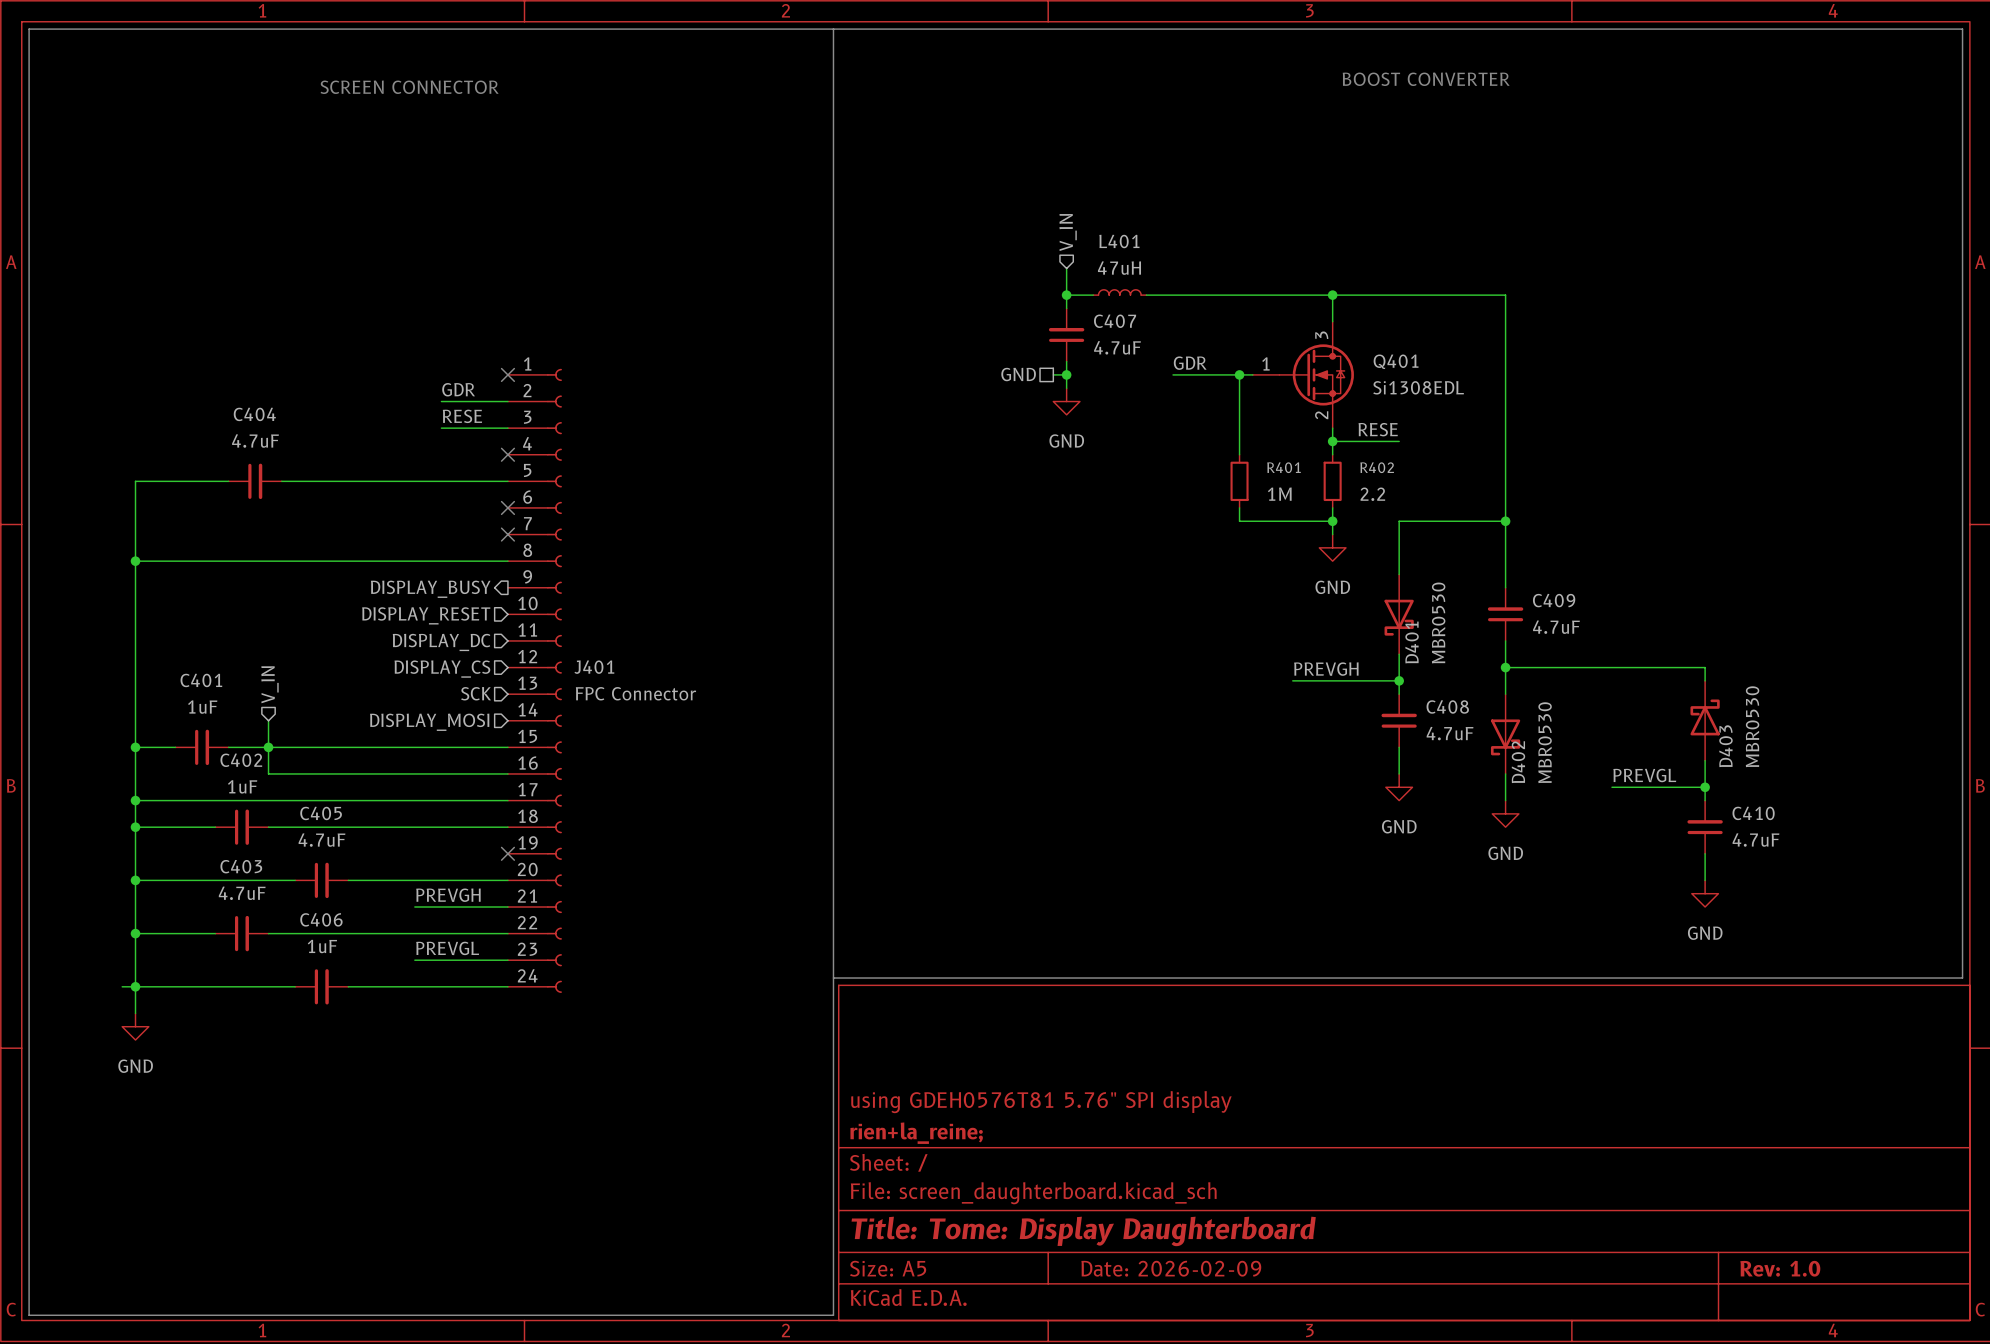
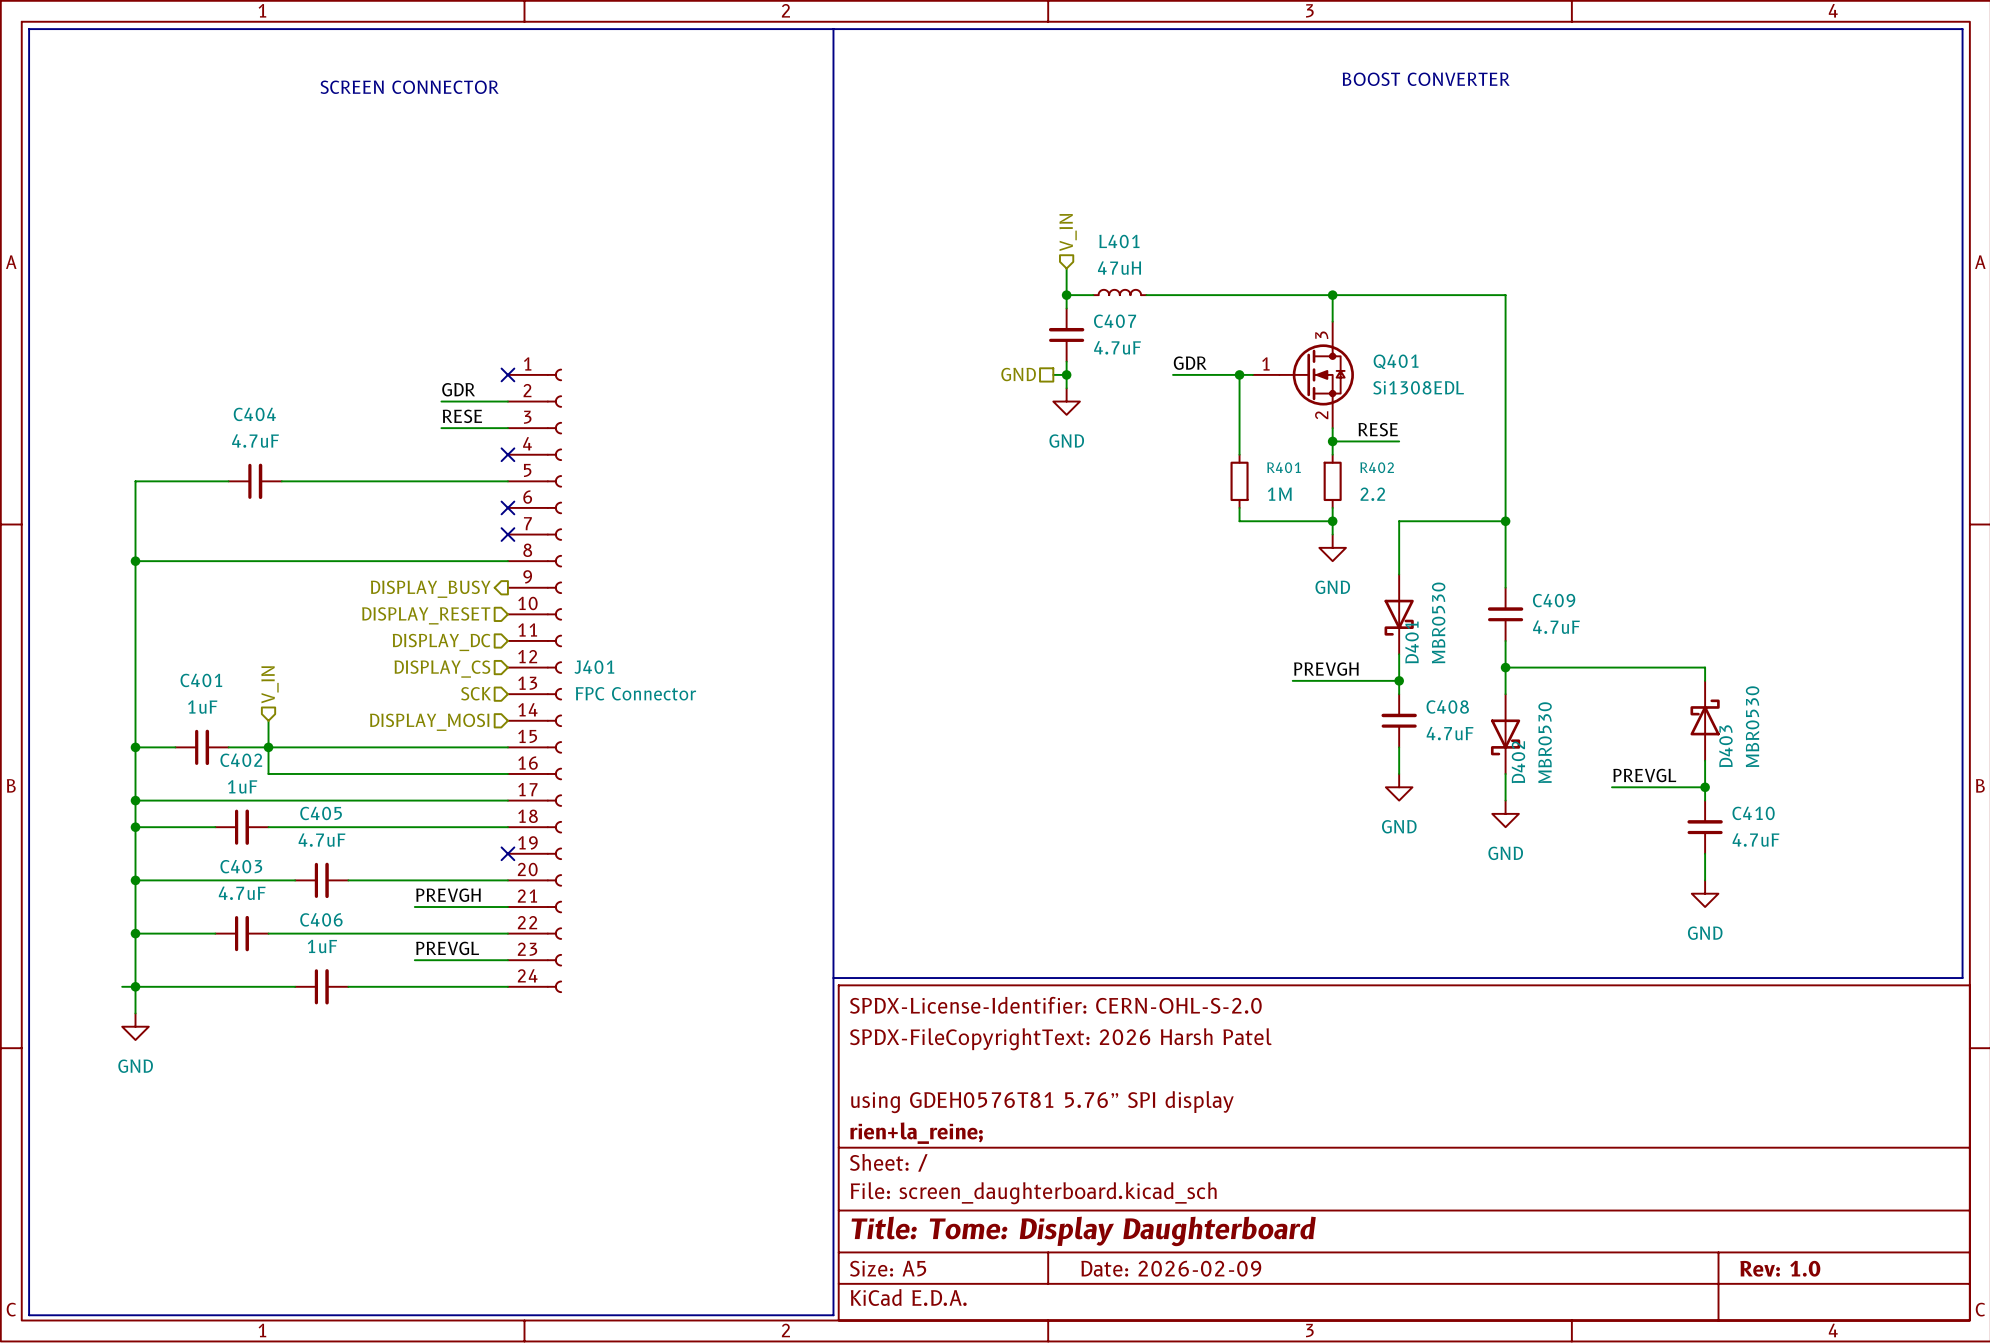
title block: none -> SPDX-License-Identifier: CERN-OHL-S-2.0 (1055, 1005)
title block: none -> SPDX-FileCopyrightText: 2026 Harsh Patel (1060, 1039)
title block: using GDEH0576T81 5.76" SPI display (1041, 1102) -> using GDEH0576T81 5.76” SPI display (1042, 1102)

